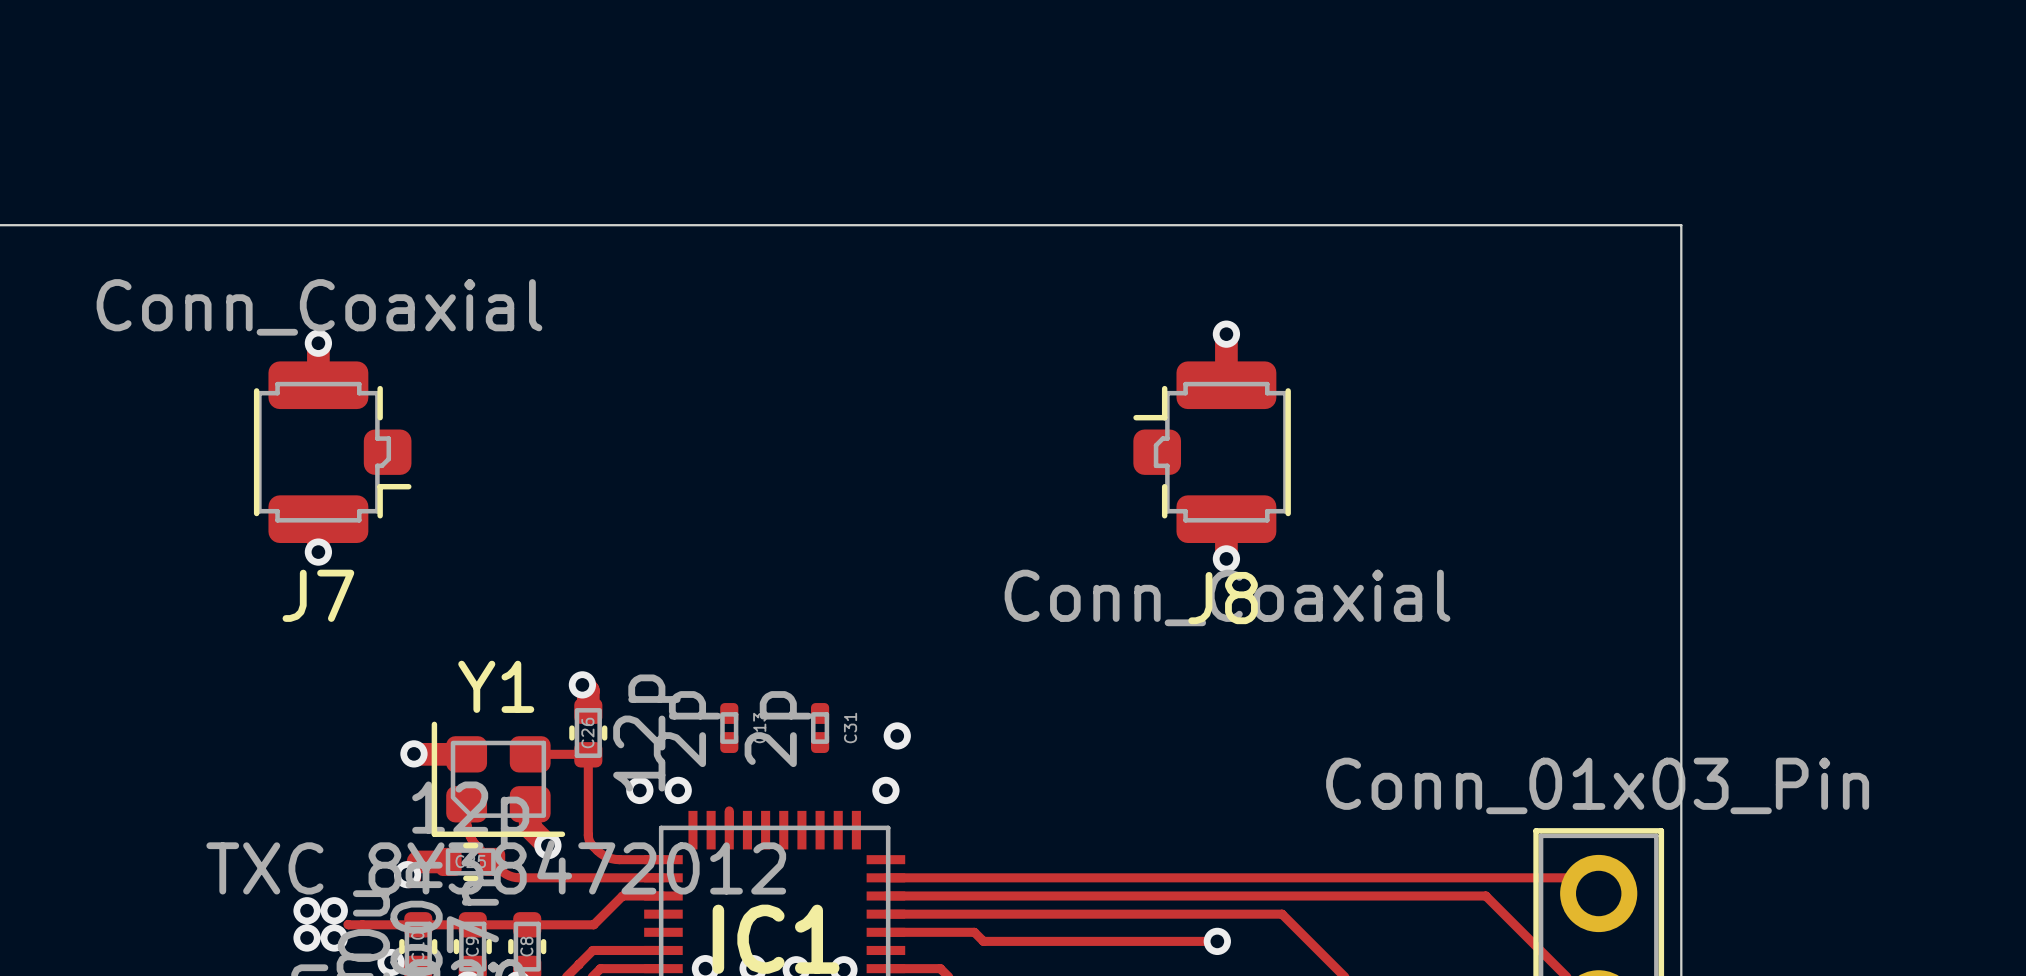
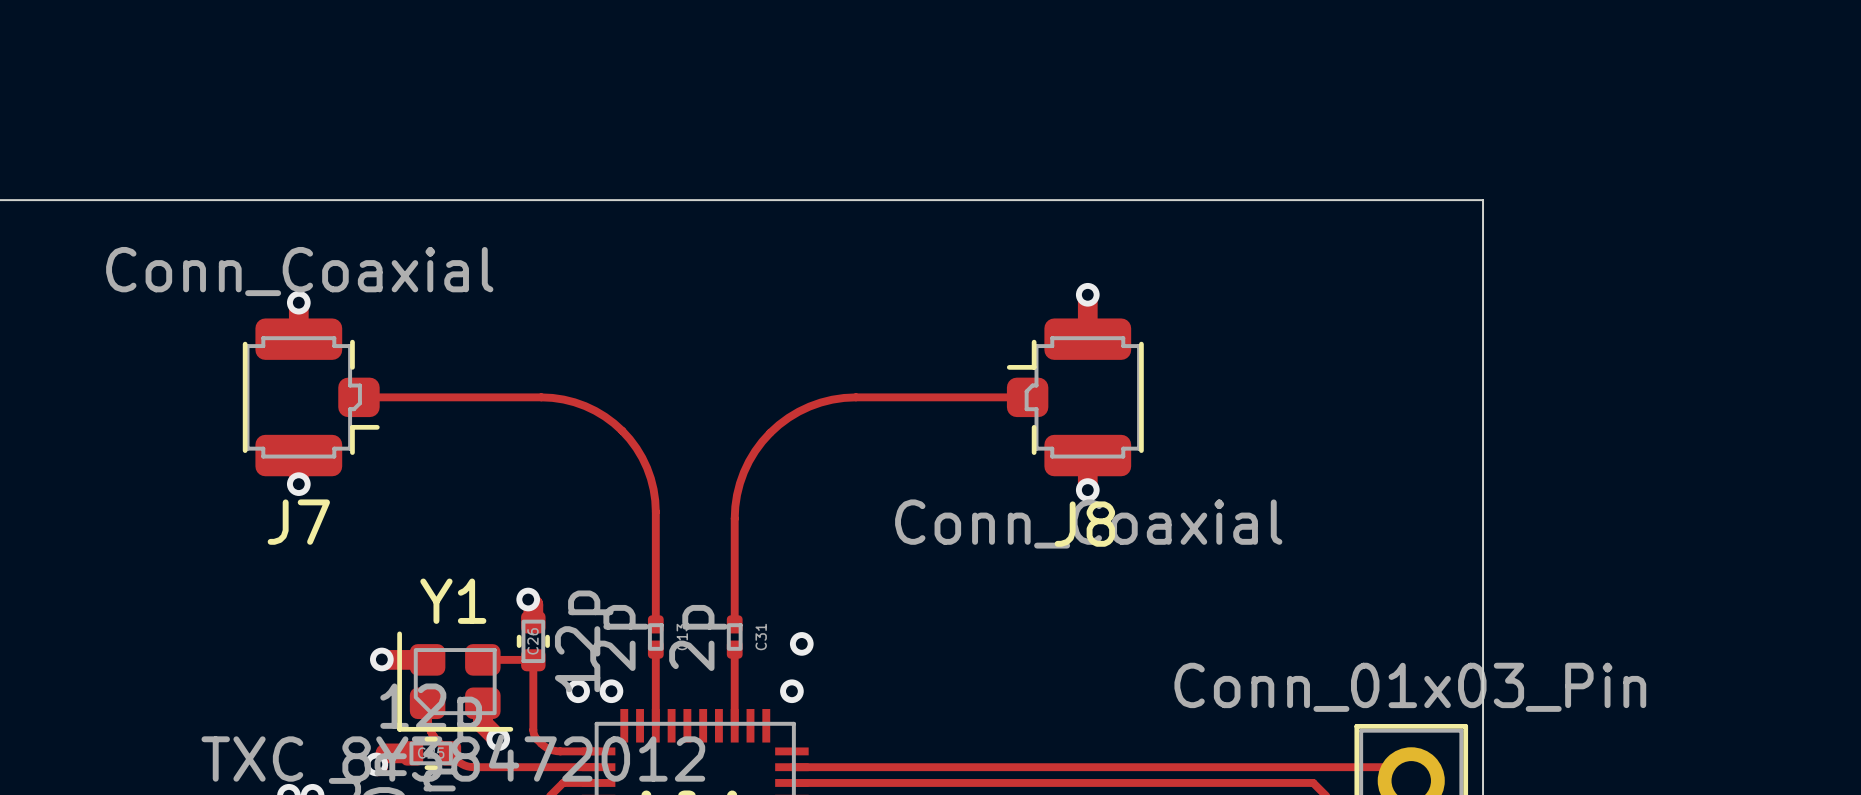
track: none -> (358, 397) (552, 397) (585, 406) (613, 423) (629, 439) (642, 457) (653, 489) (655, 511) (655, 624)
track: none -> (1027, 397) (844, 397) (809, 406) (779, 424) (762, 441) (749, 461) (737, 494) (734, 518) (734, 624)
track: none -> (655, 649) (655, 709)
track: none -> (734, 649) (734, 725)

